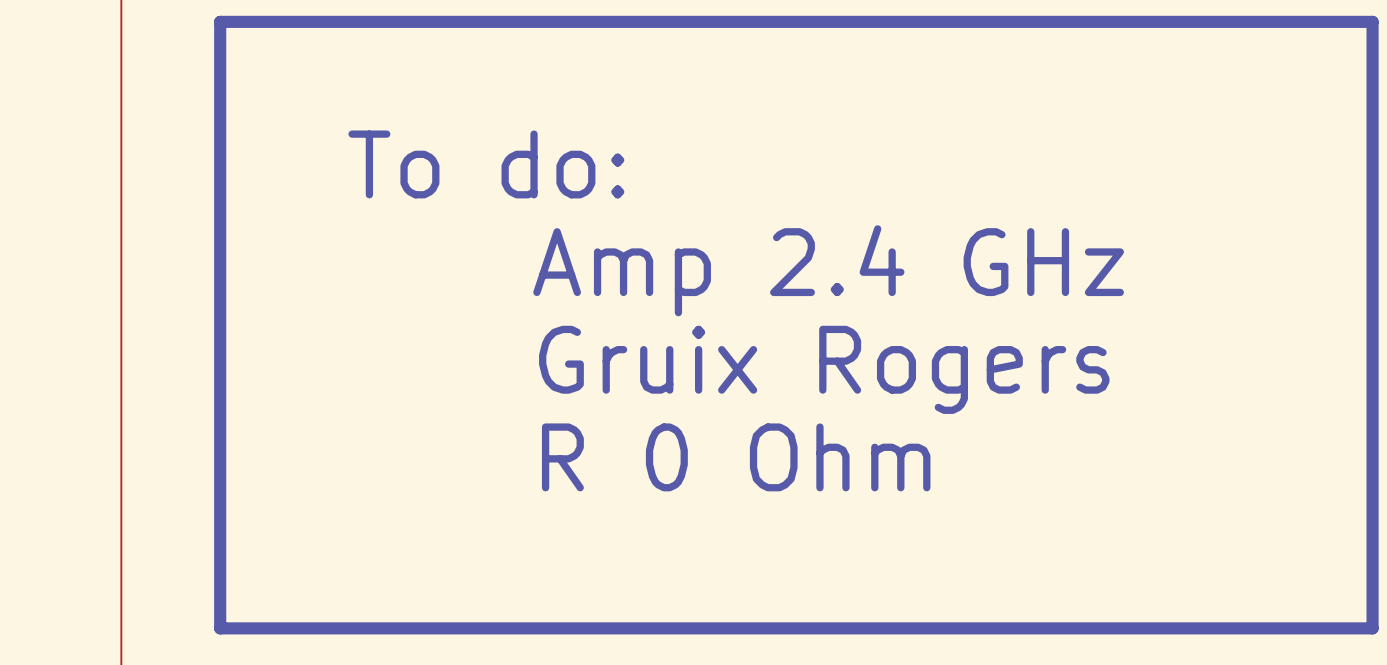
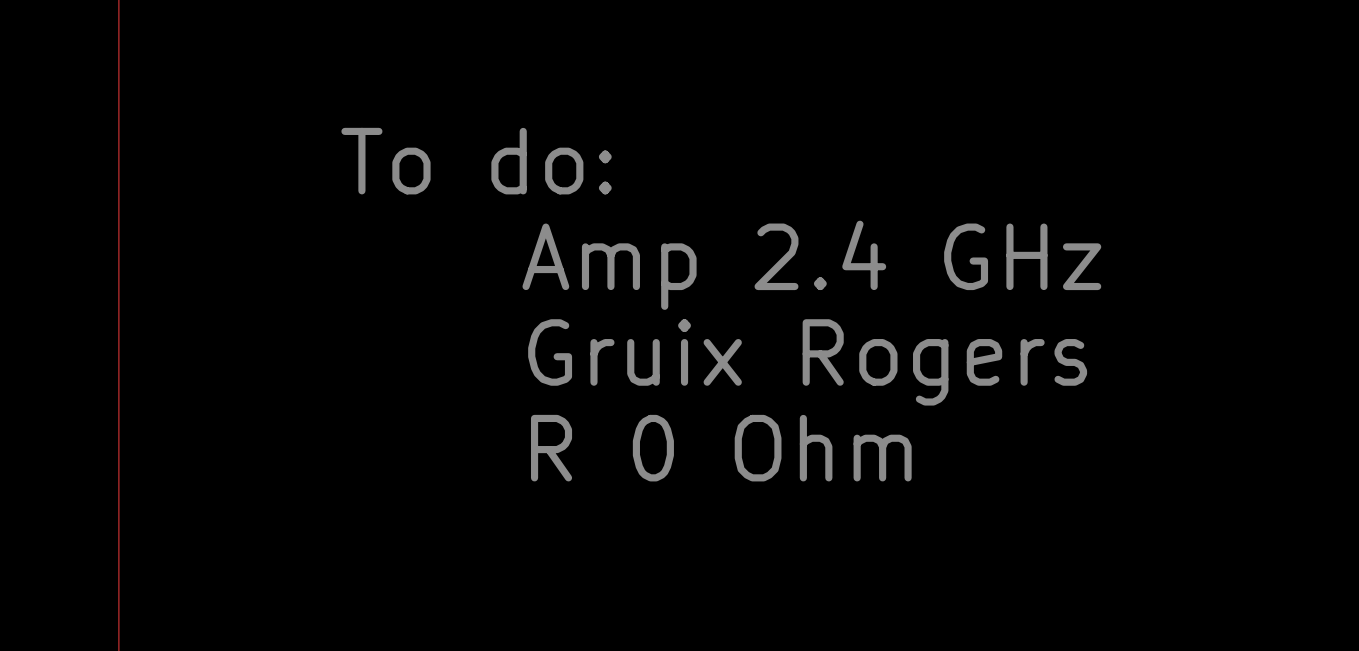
line: (220, 21) (1372, 21) (1372, 628) (220, 628) (220, 21) -> none

